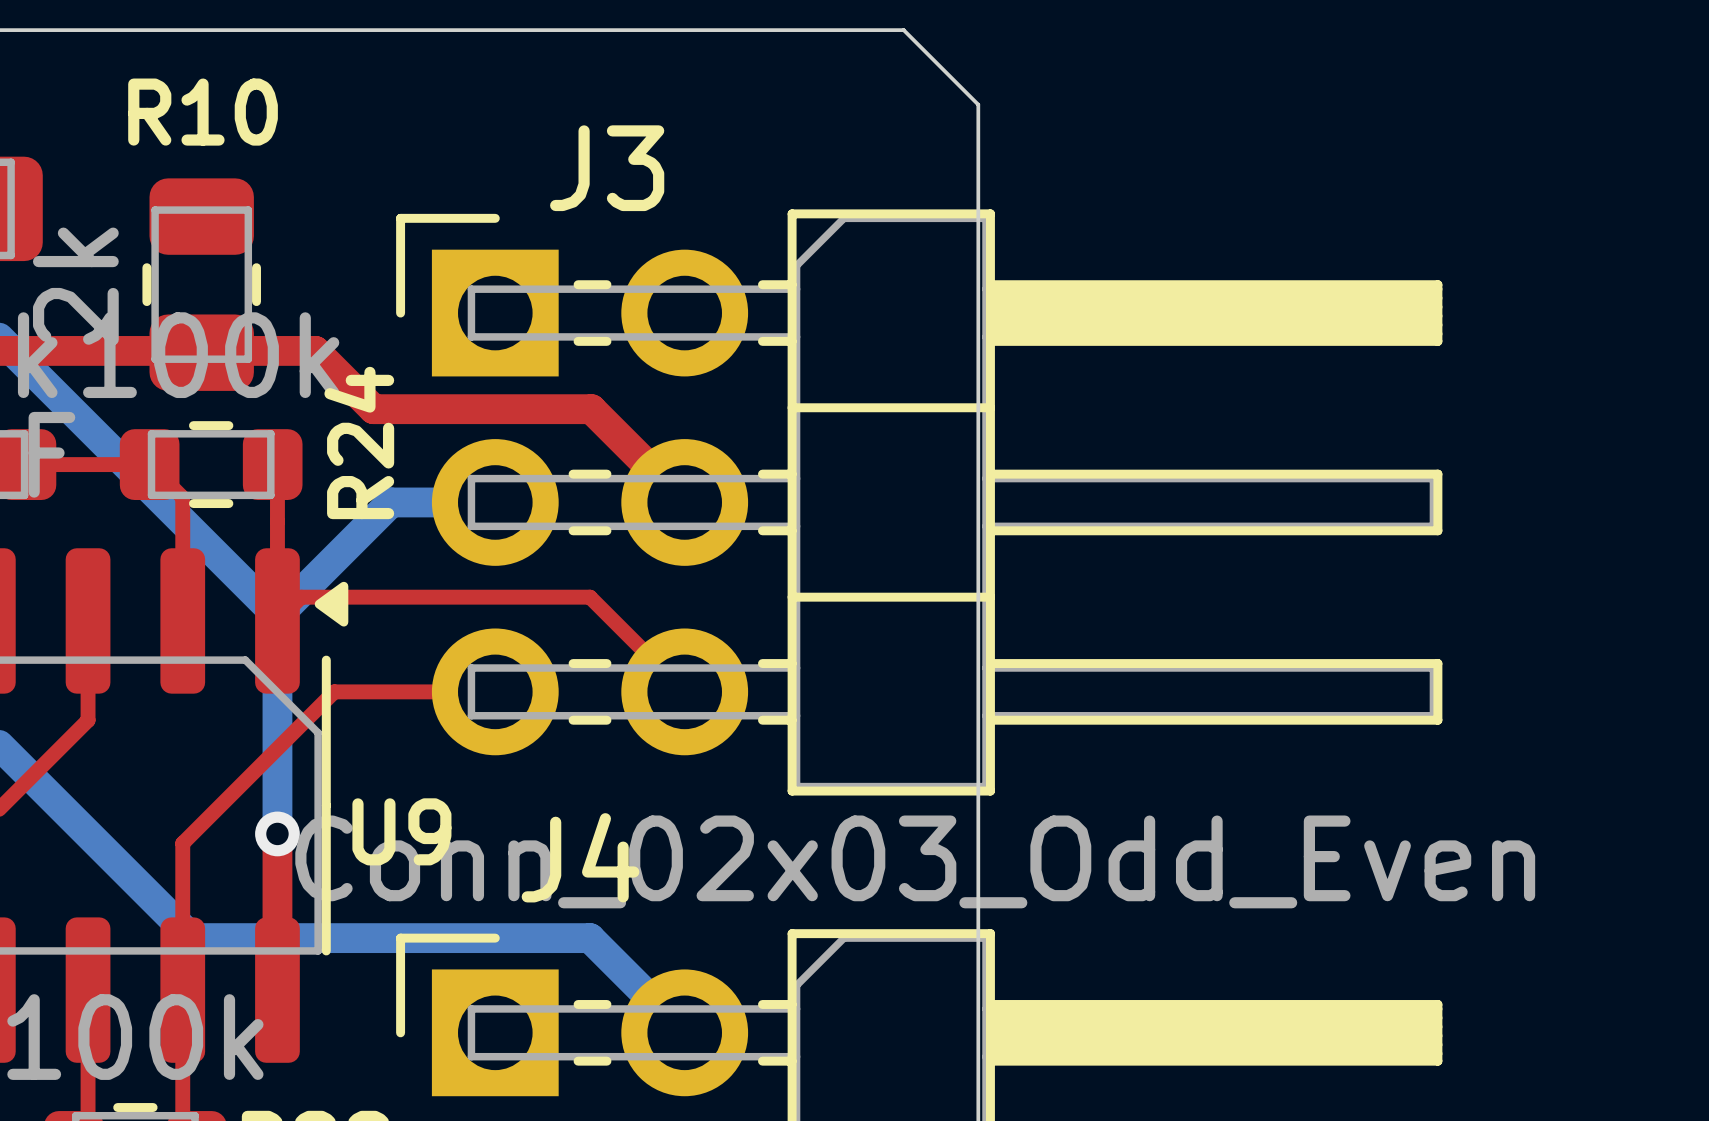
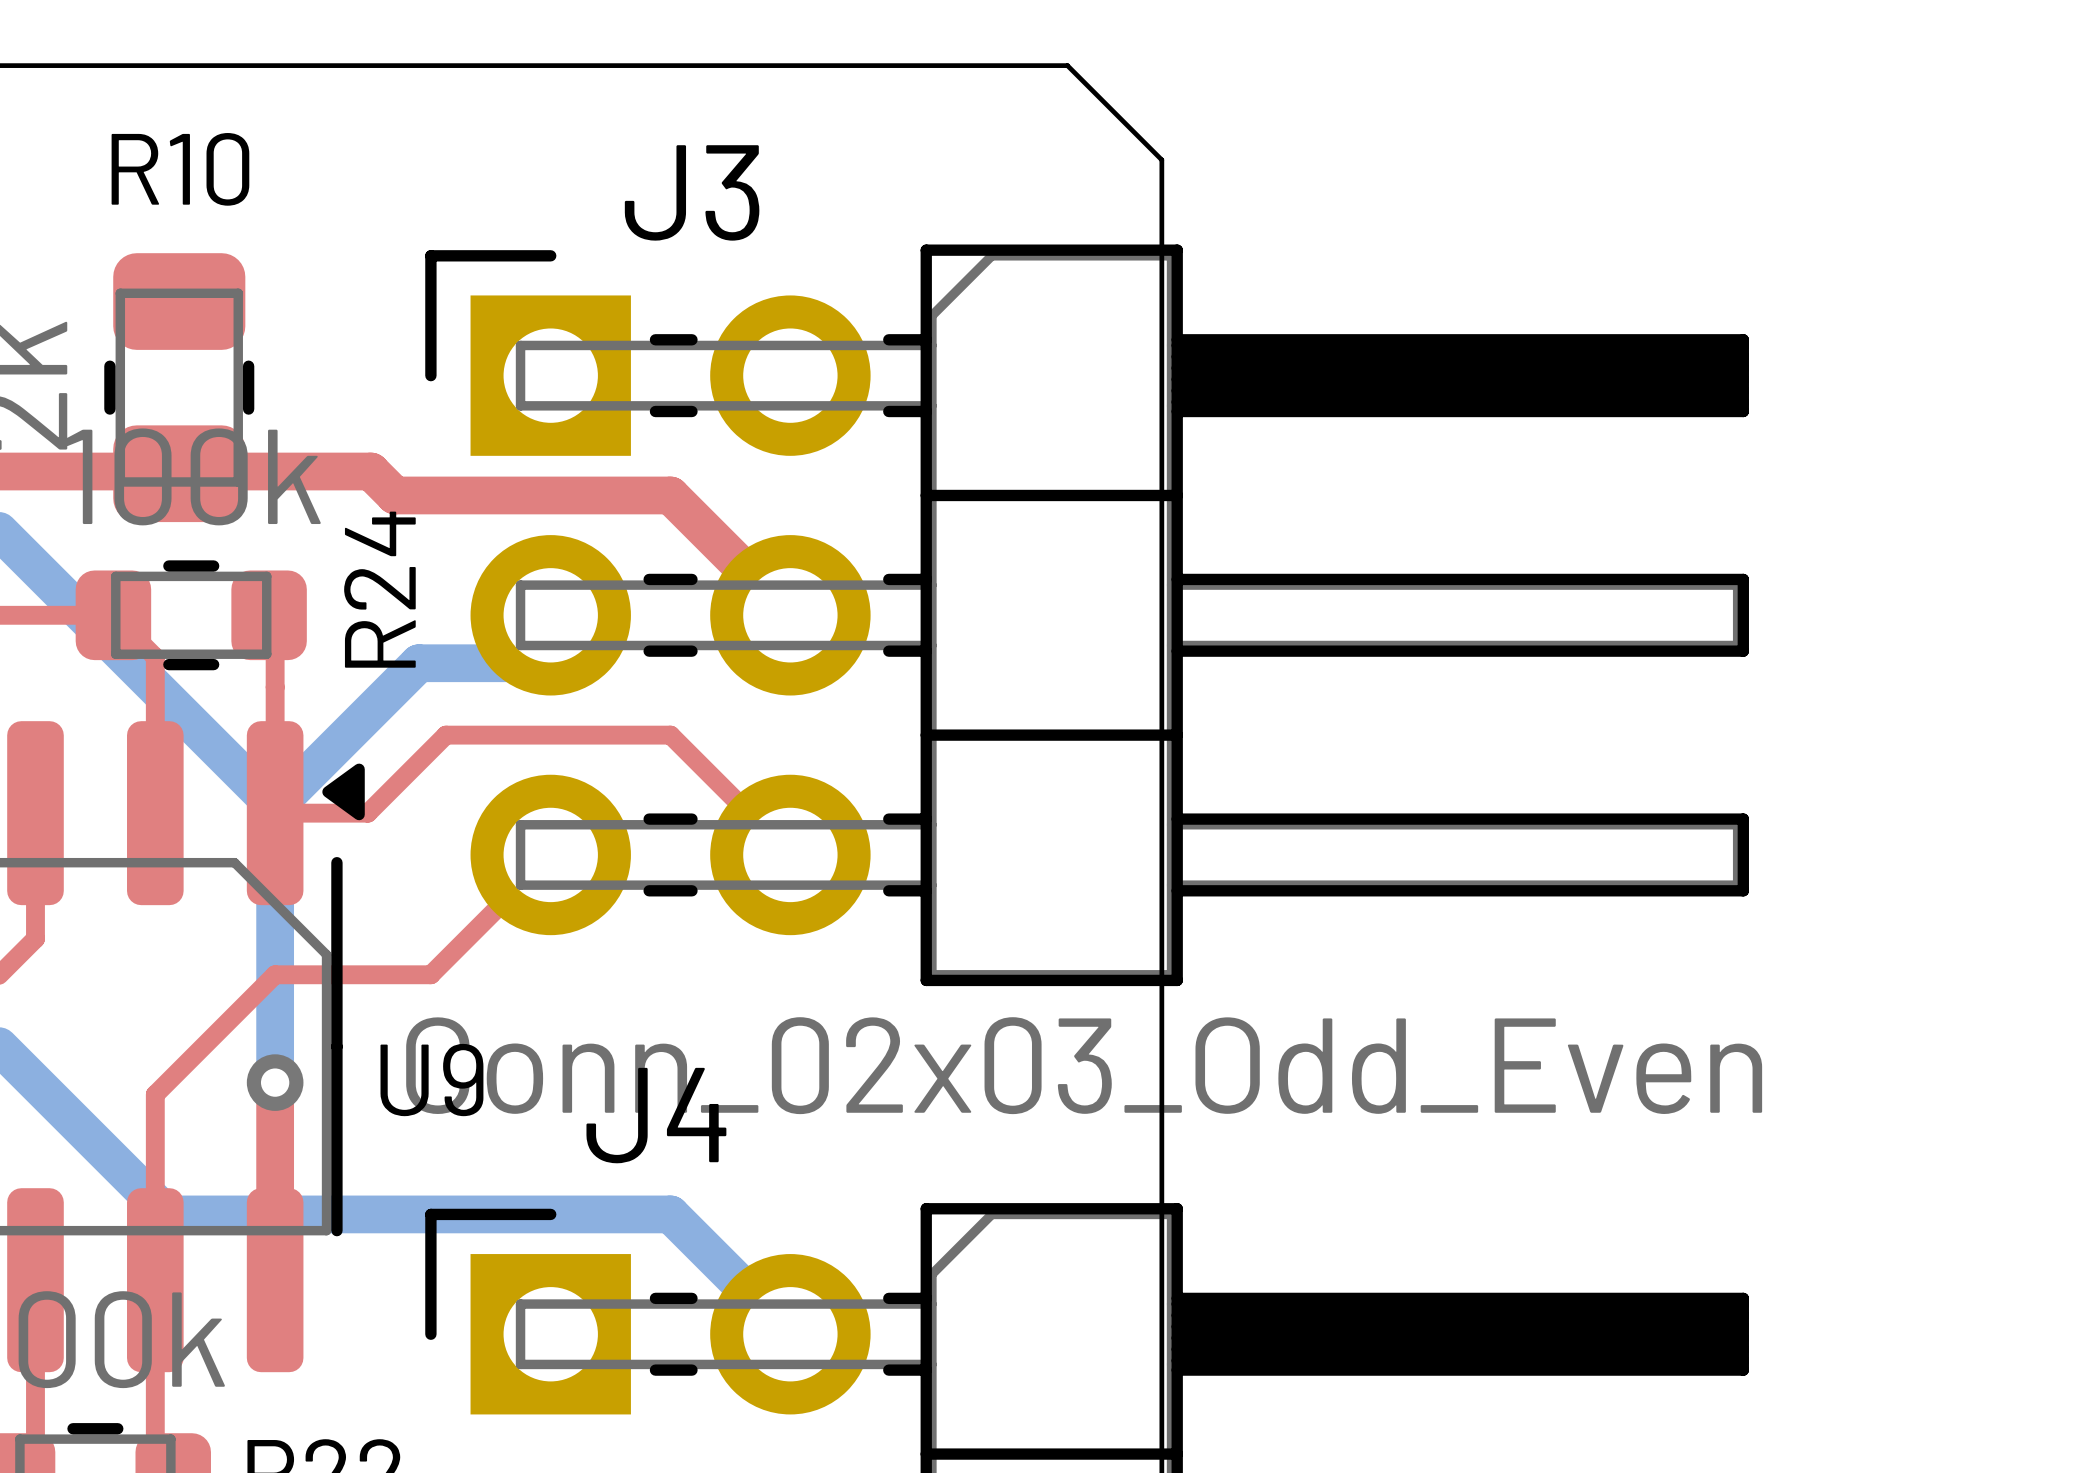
top track: (315, 350) (373, 409) (591, 409) (684, 502) -> (323, 471) (370, 471) (394, 495) (670, 495) (790, 615)
J3 position: (919, 502) -> (1087, 615)
top track: (277, 620) (301, 597) (590, 597) (684, 691) -> (275, 813) (367, 813) (445, 735) (670, 735) (790, 854)
top track: (457, 691) (334, 691) (277, 748) -> (502, 902) (430, 974) (275, 974)

